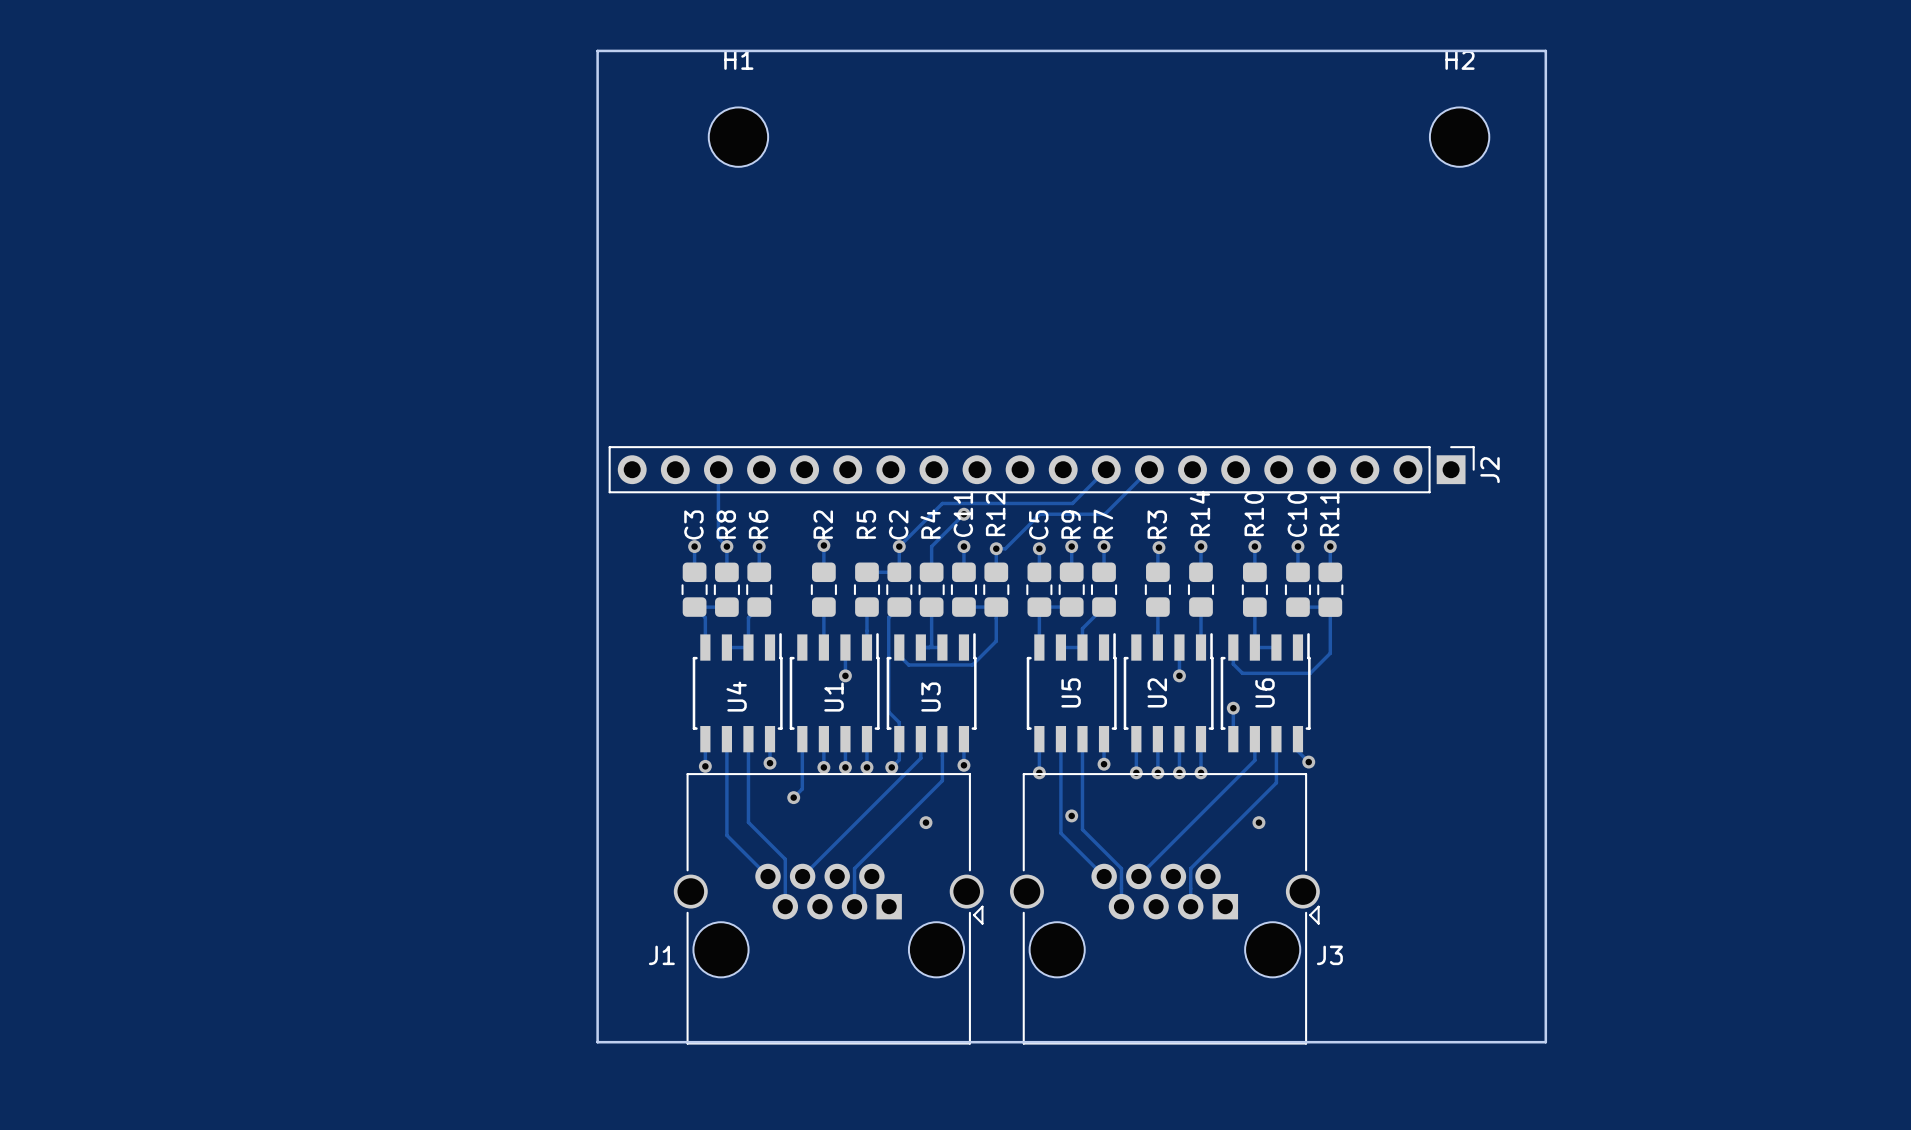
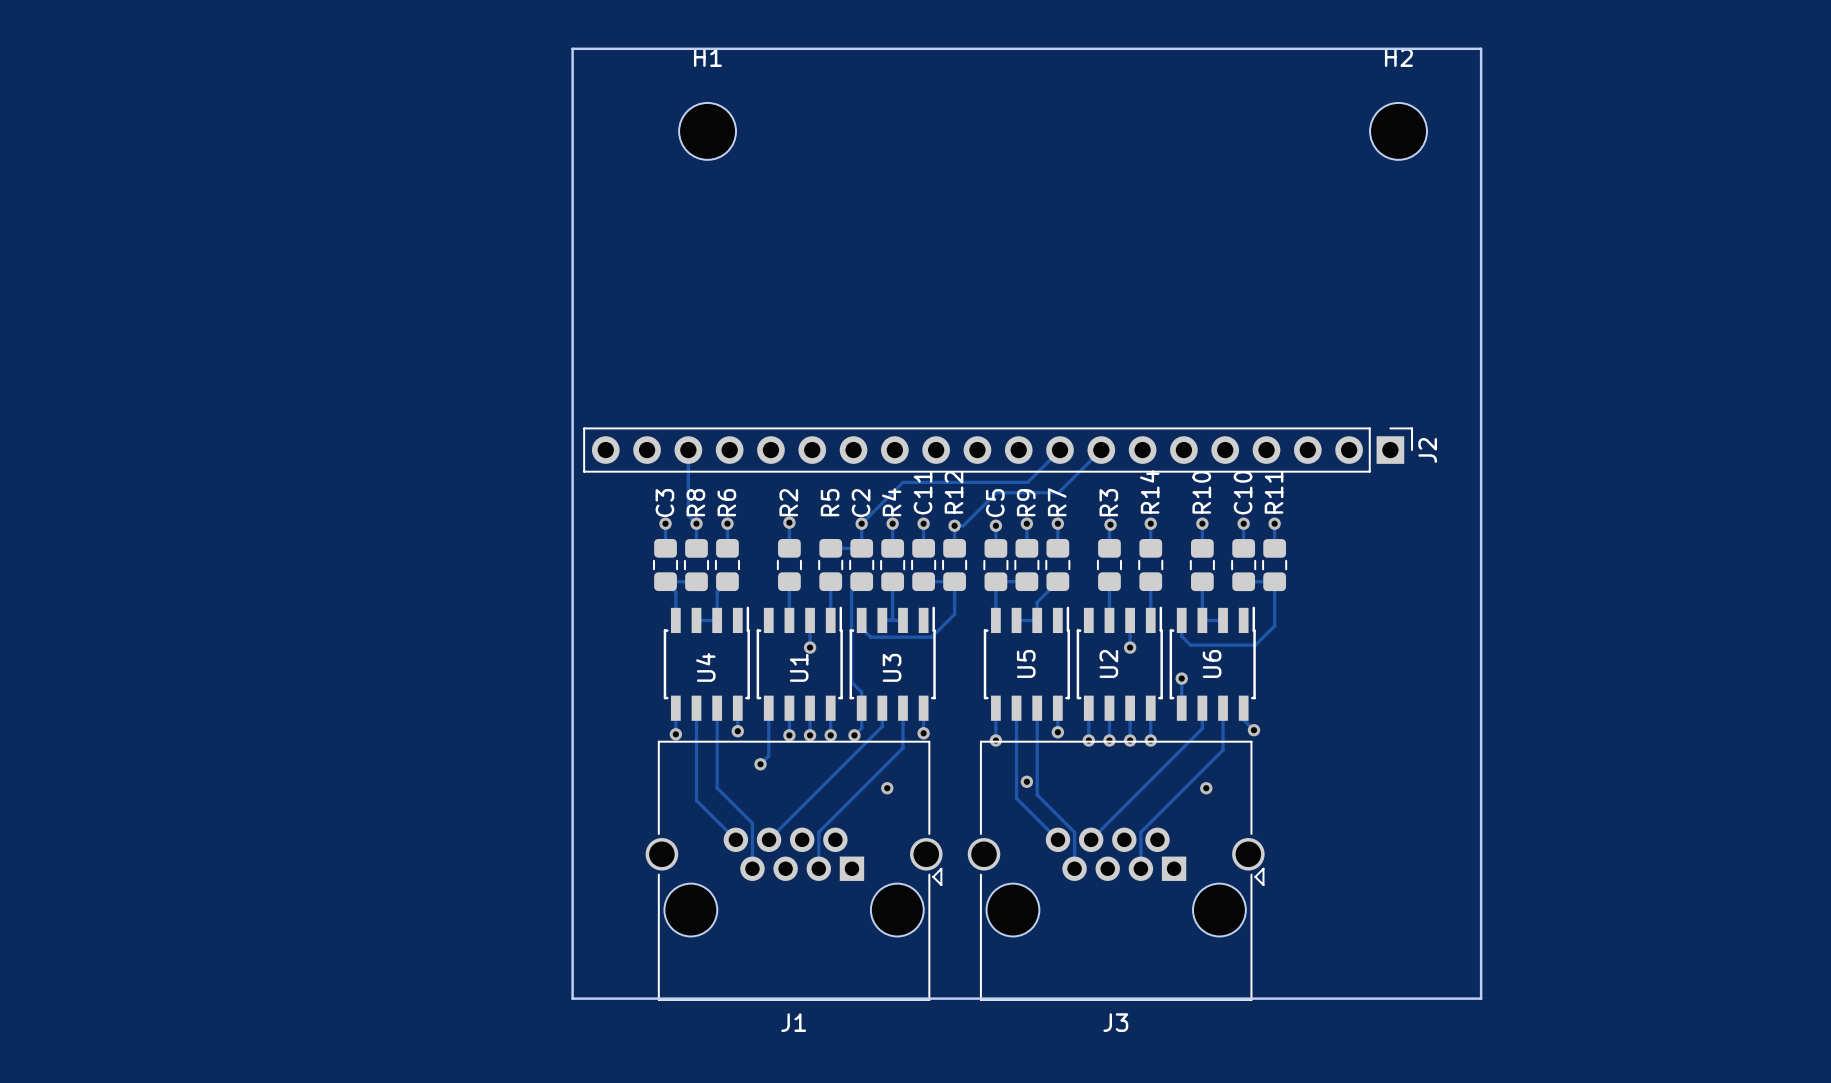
track: (963, 514) (931, 546) -> none
via position: (963, 514) -> (892, 523)
J1 name position: J1 (661, 955) -> J1 (793, 1022)
J3 name position: J3 (1329, 955) -> J3 (1115, 1022)

